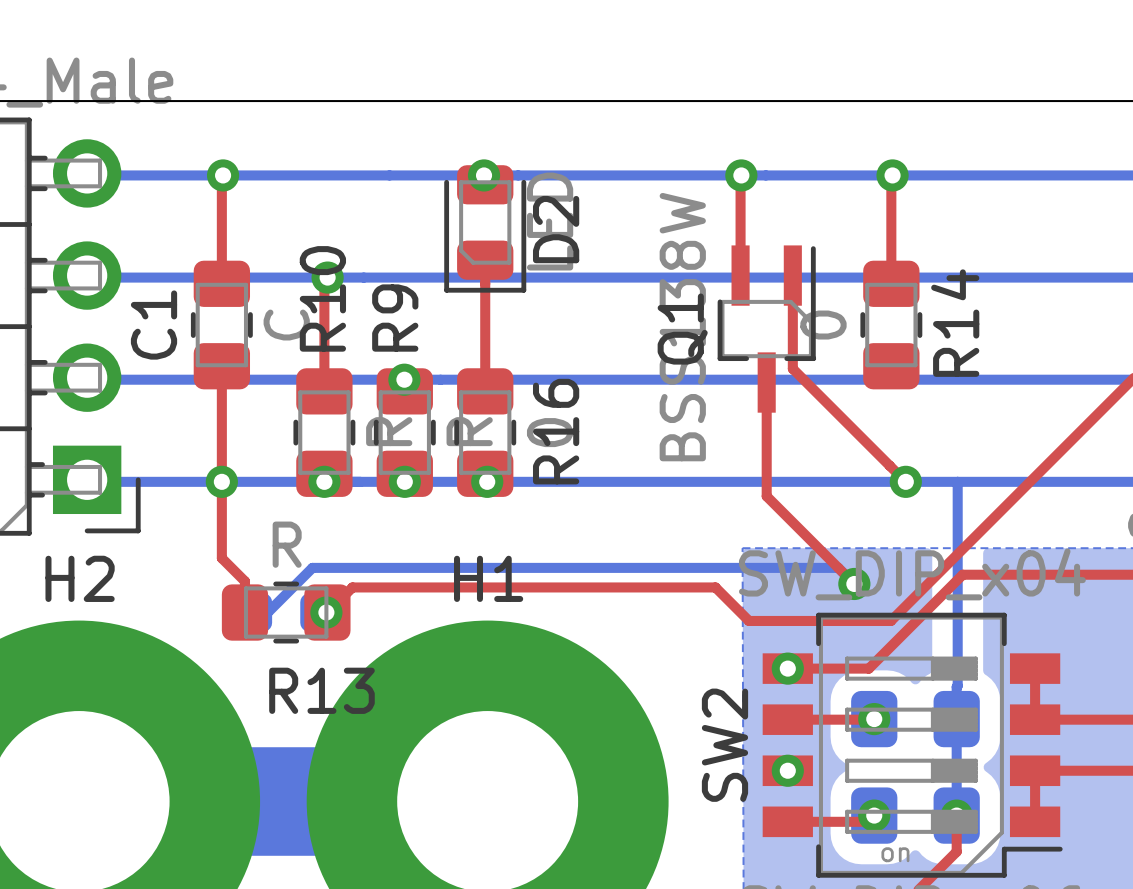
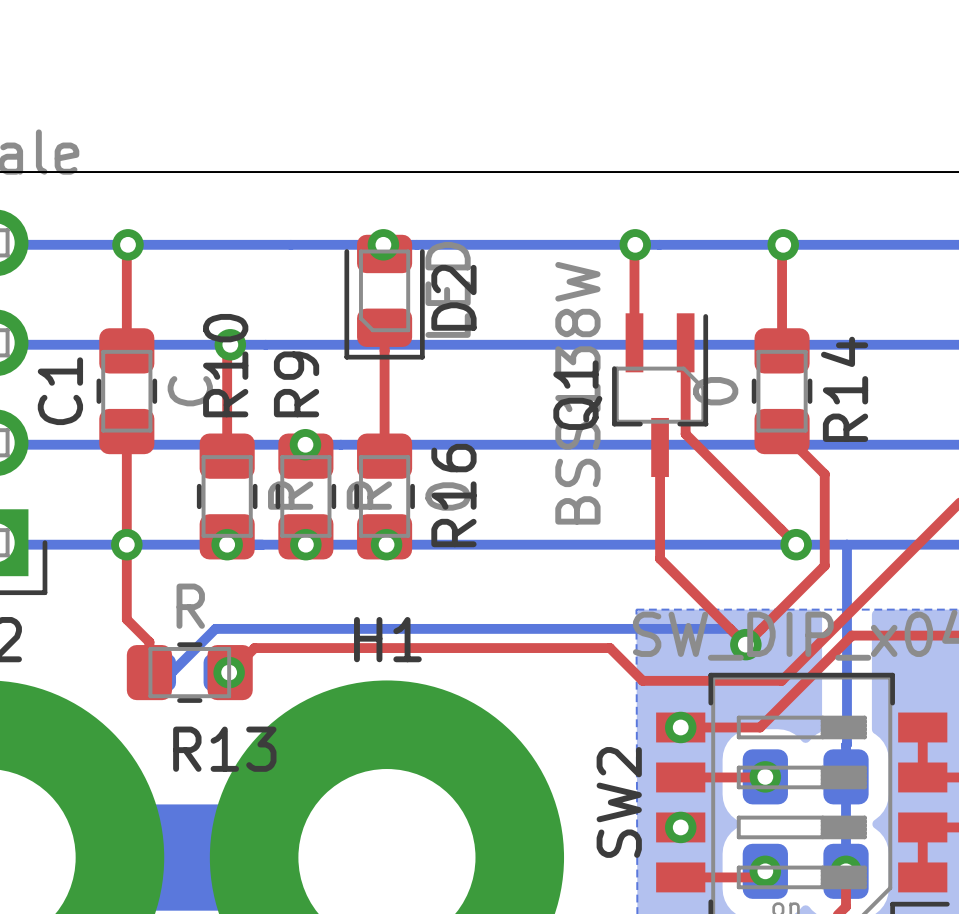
top track: none -> (782, 431) (824, 474) (824, 565) (745, 644)

